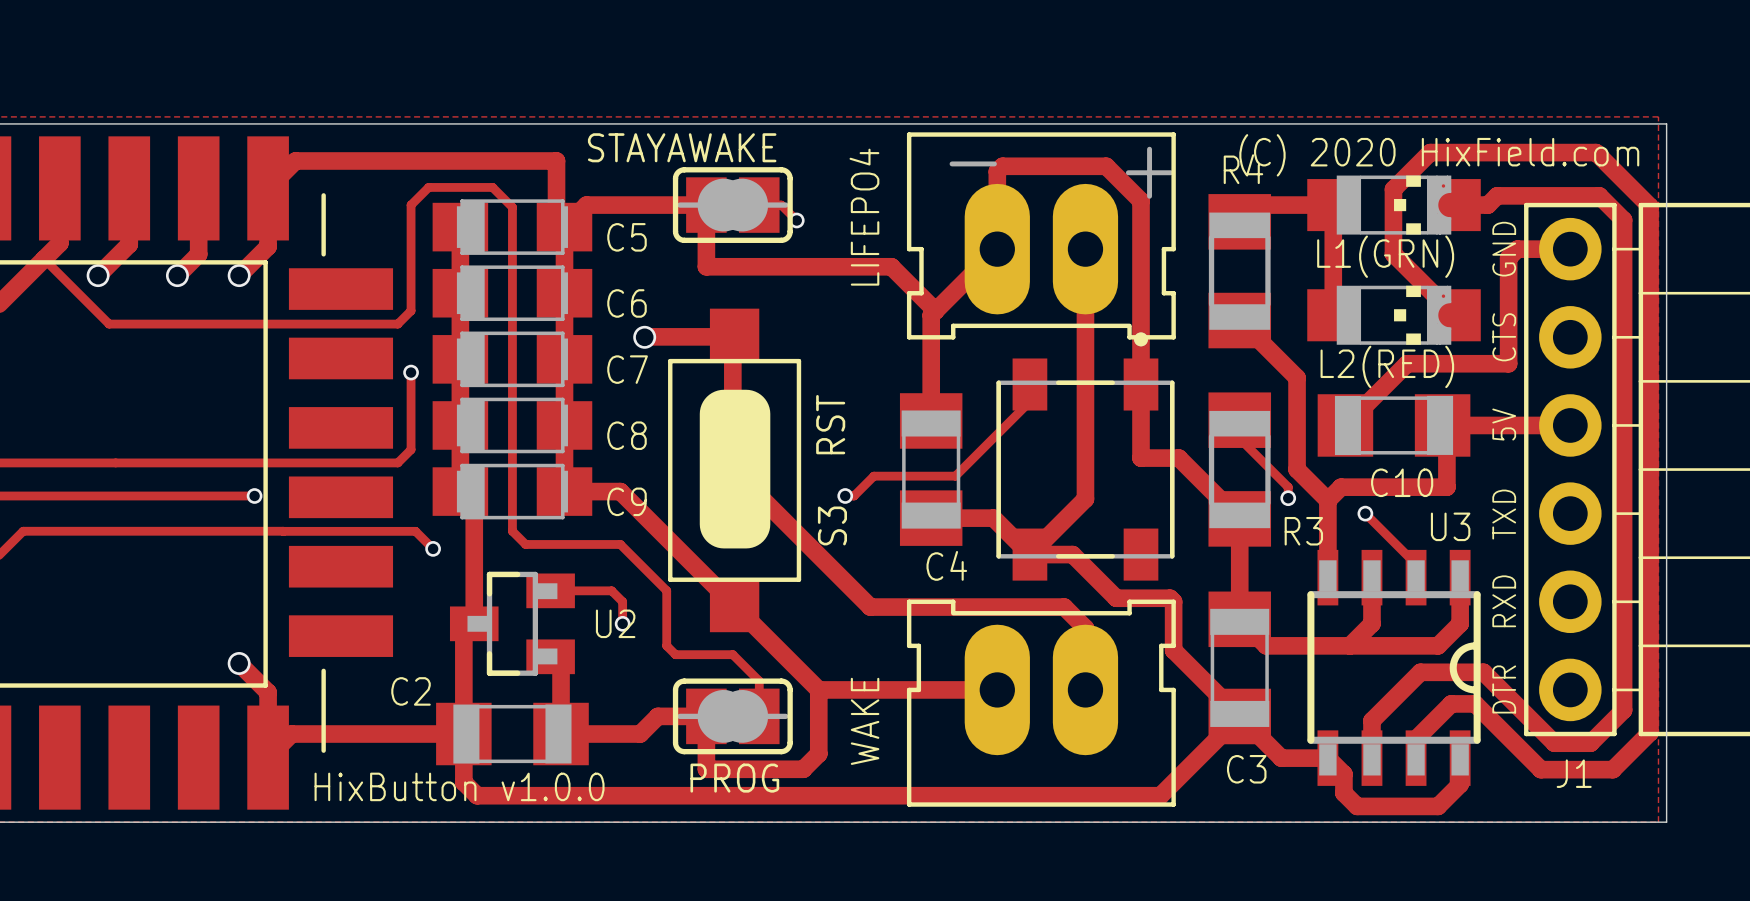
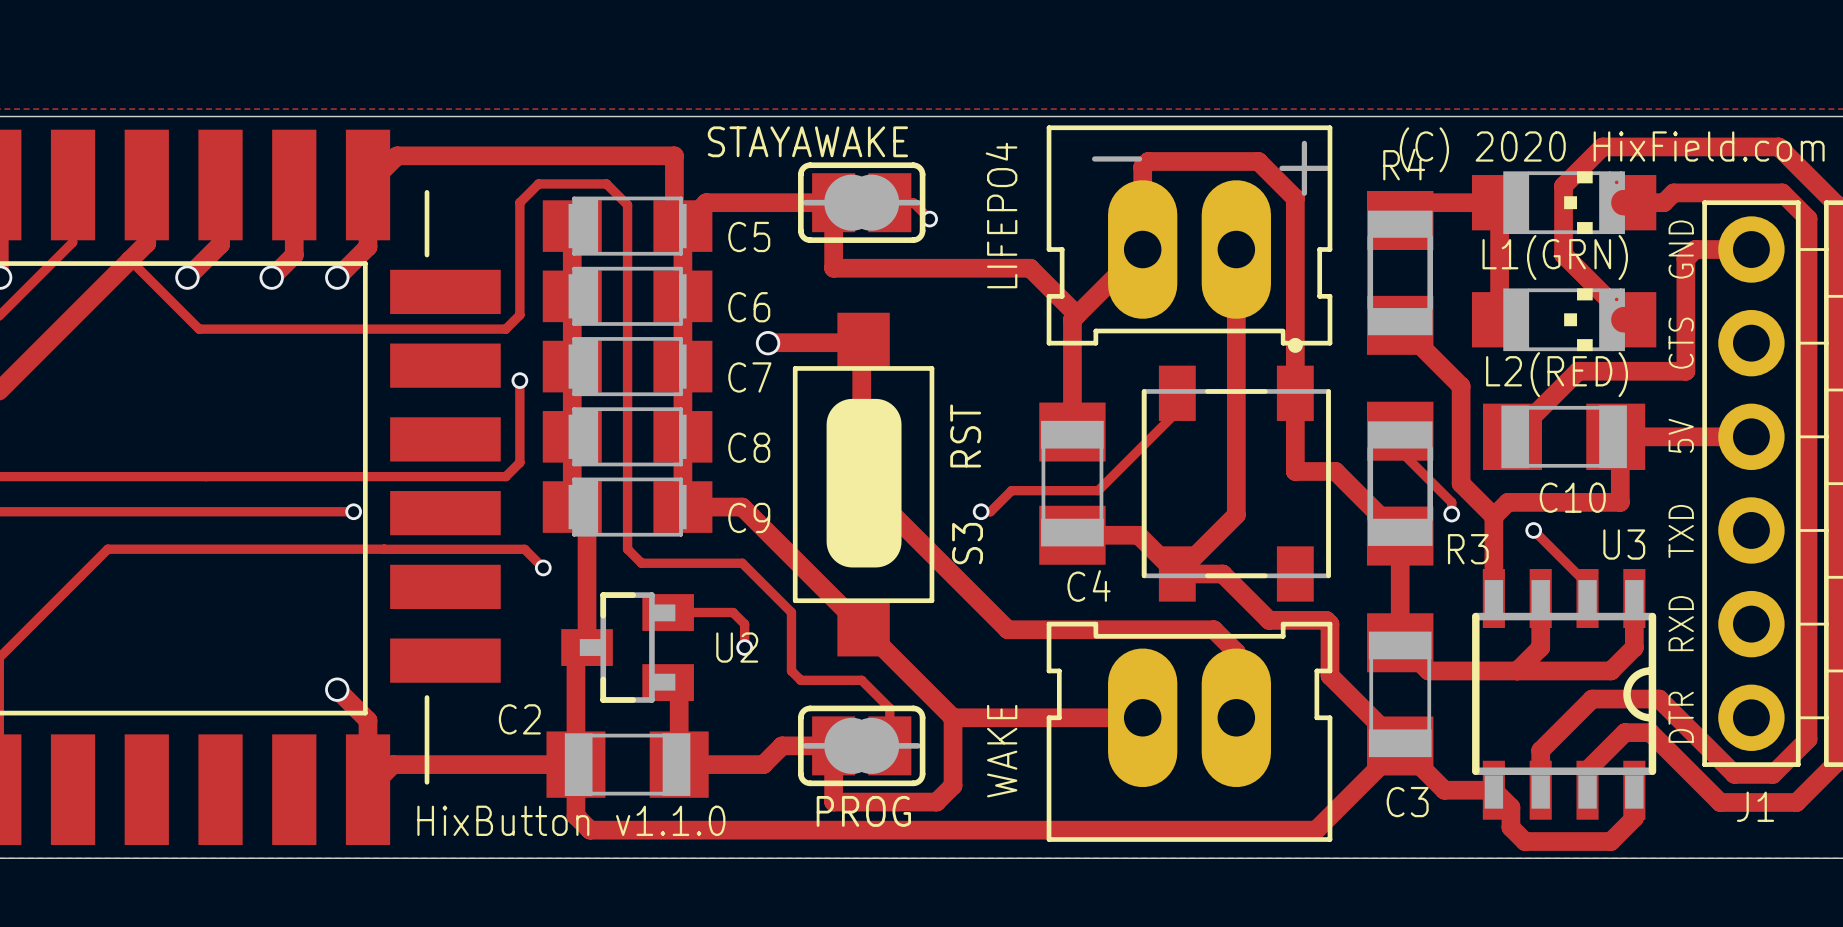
text: HixButton v1.0.0 (459, 786) -> HixButton v1.1.0 (571, 820)

